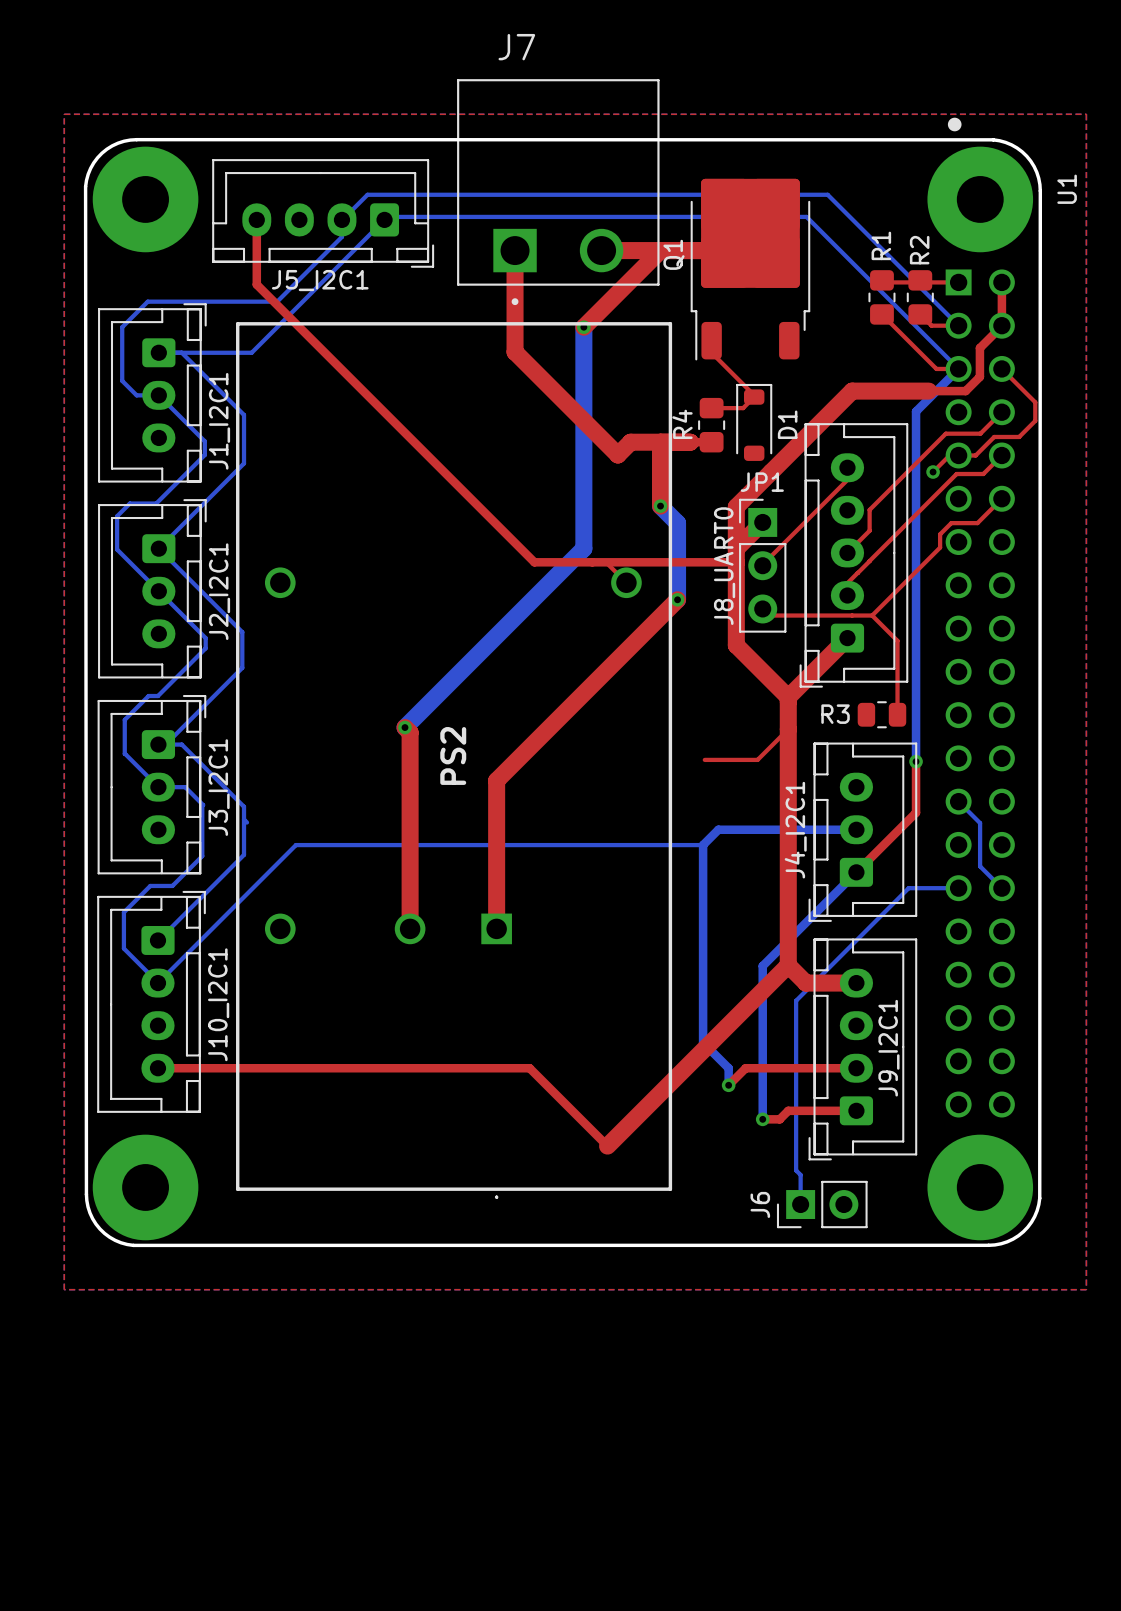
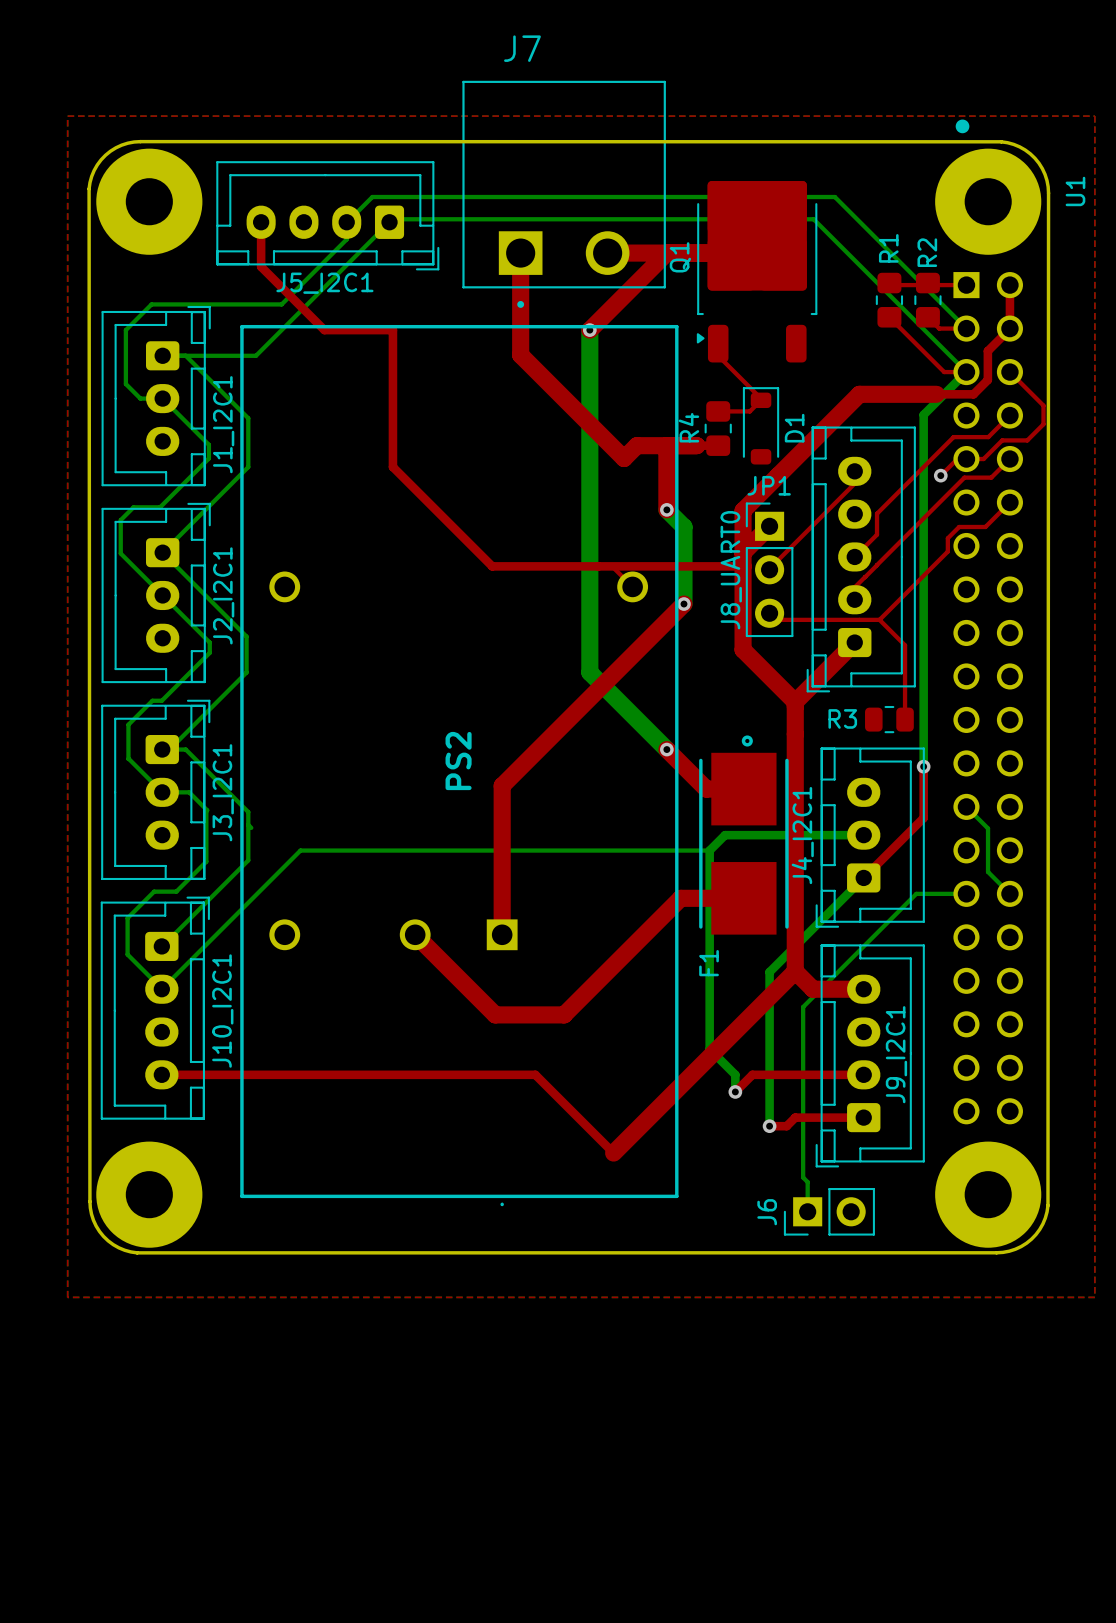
Q1 footprint: [690, 178, 811, 361] -> [696, 181, 818, 363]
top track: (256, 264) (256, 284) (534, 562) -> (261, 266) (324, 330) (392, 330) (392, 467) (492, 566) (540, 566)
bottom track: (583, 548) (404, 727) -> (589, 552) (589, 672) (666, 749)
top track: (404, 727) (410, 732) (410, 928) -> (743, 898) (680, 898) (564, 1014) (495, 1014) (415, 934)
via: (404, 727) -> none
top track: (788, 729) (757, 759) (704, 759) -> none
top track: none -> (666, 749) (706, 789) (743, 789)
via: none -> (666, 749)
F1: none -> (743, 835)

